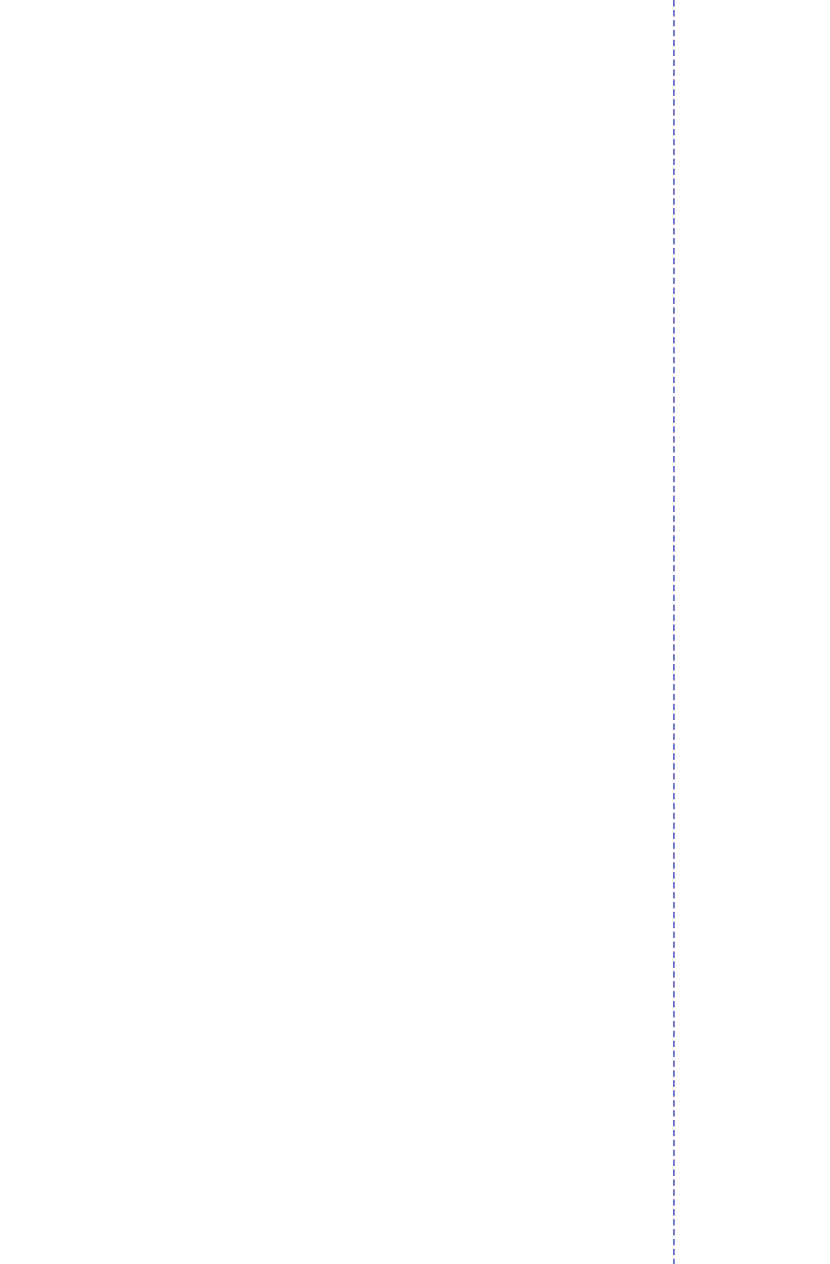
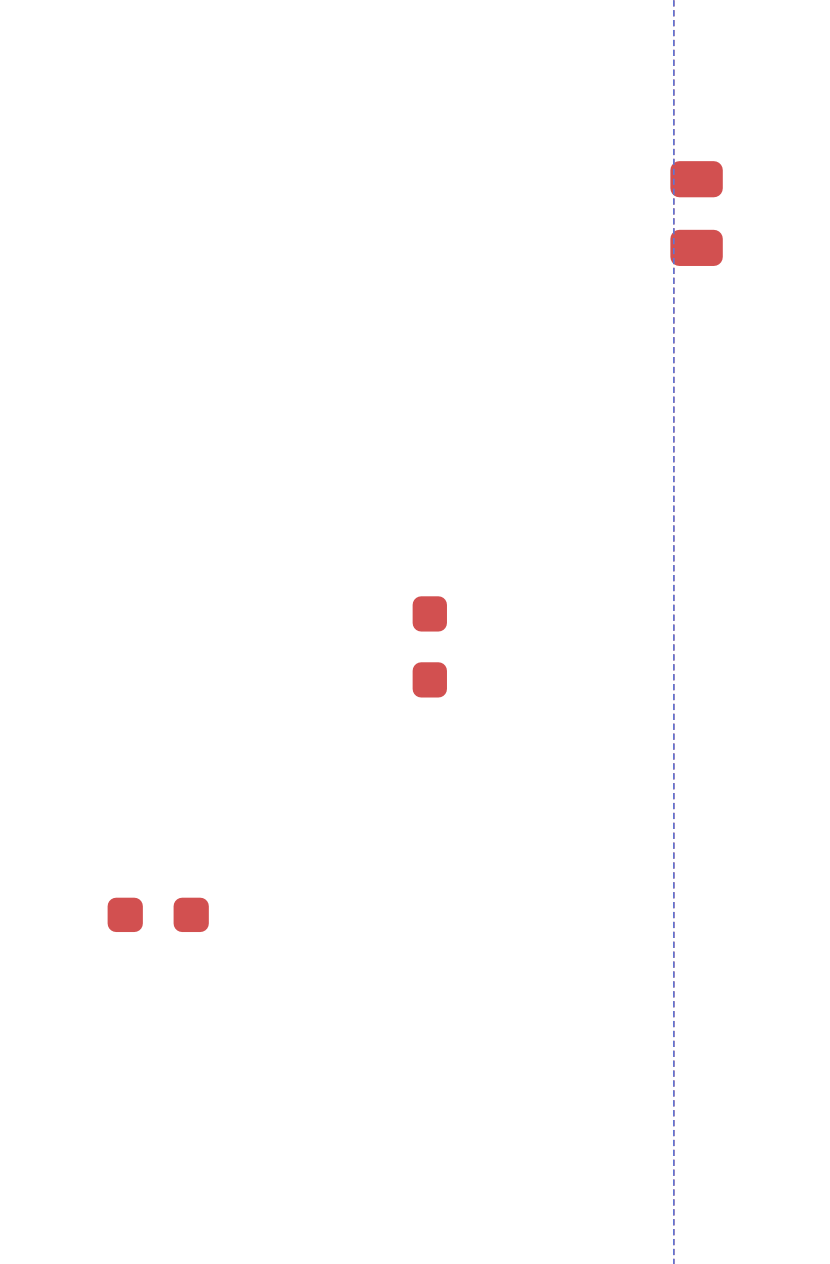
part: none -> (696, 213)
part: none -> (429, 646)
part: none -> (158, 914)

